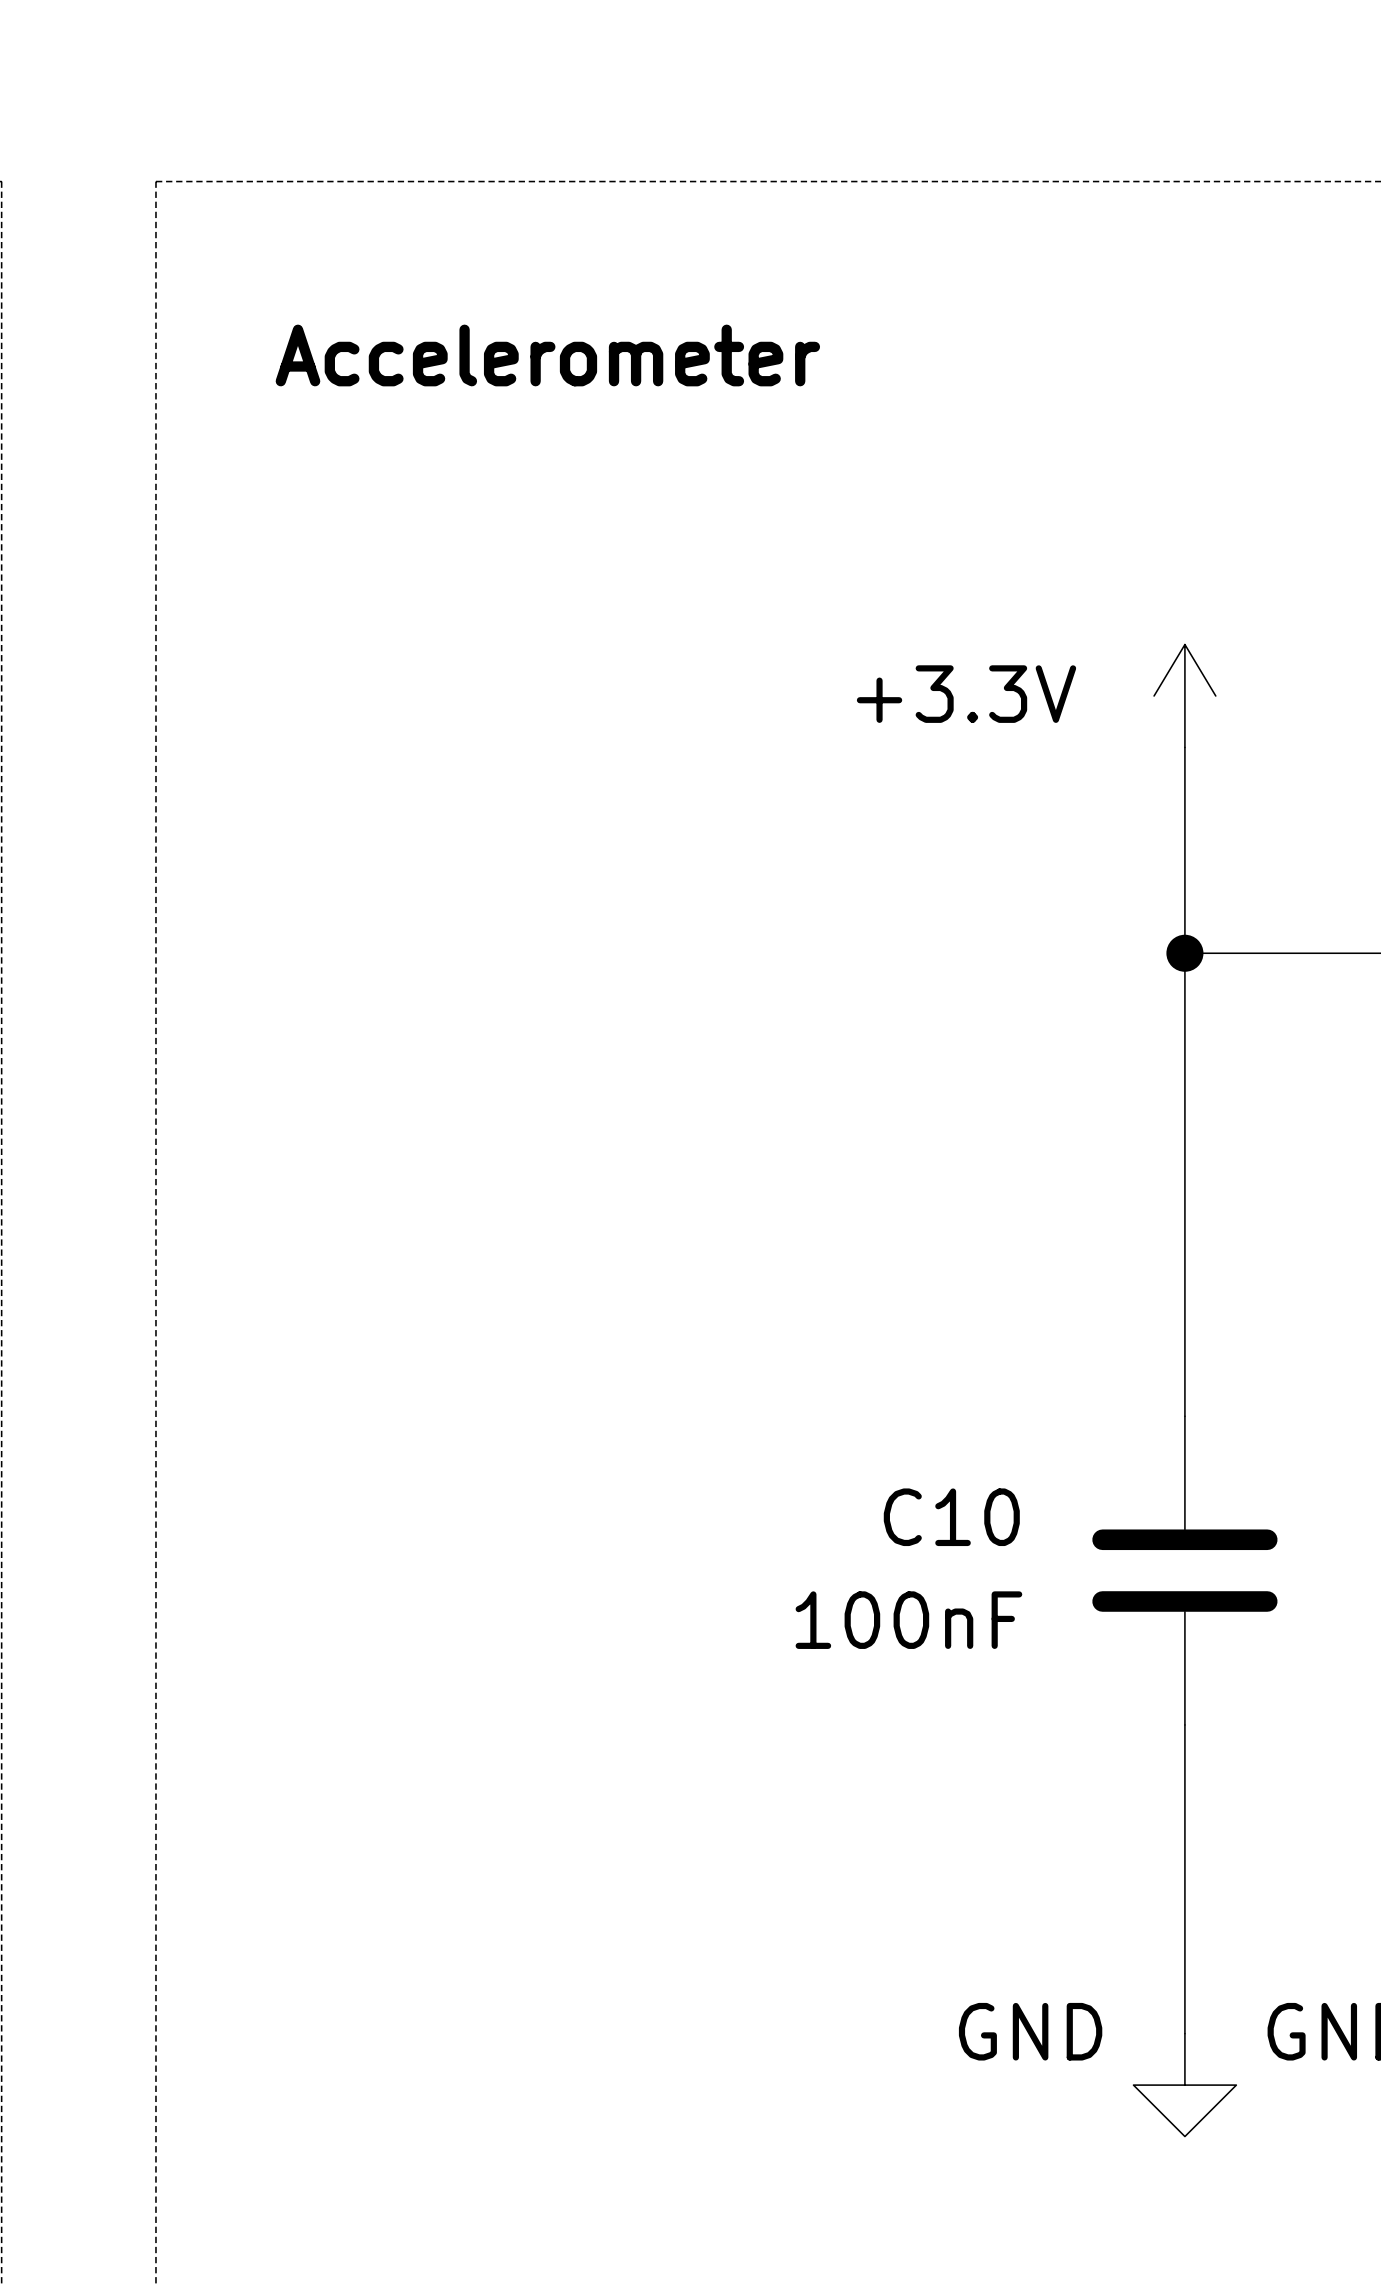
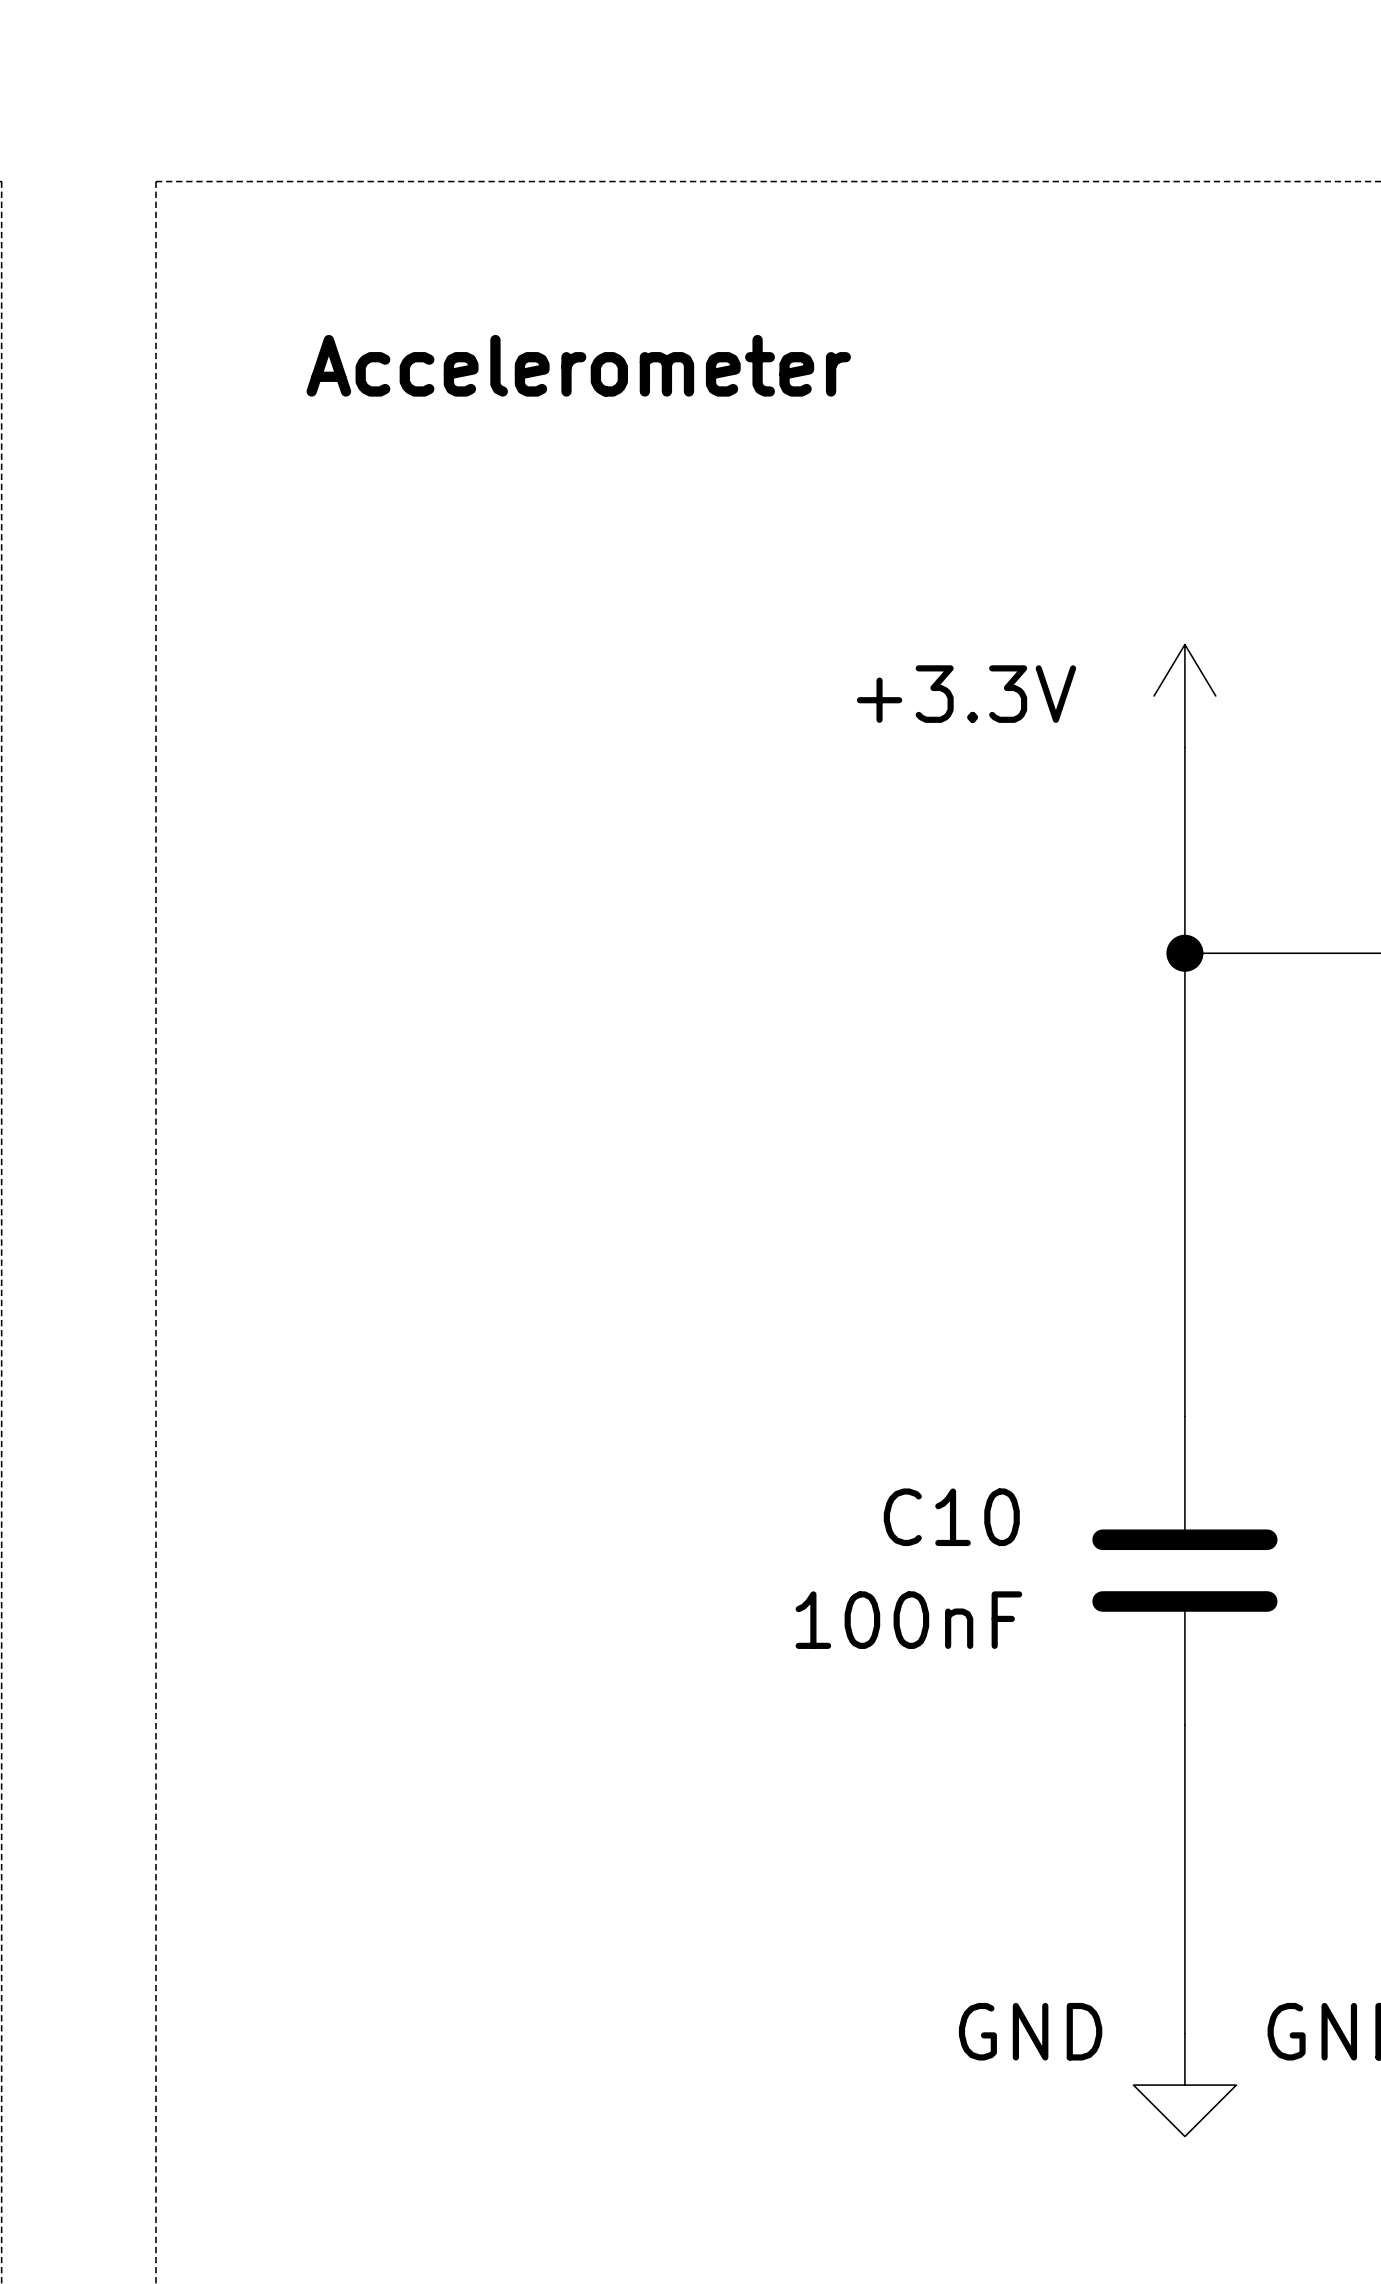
text position: Accelerometer (547, 355) -> Accelerometer (578, 365)

